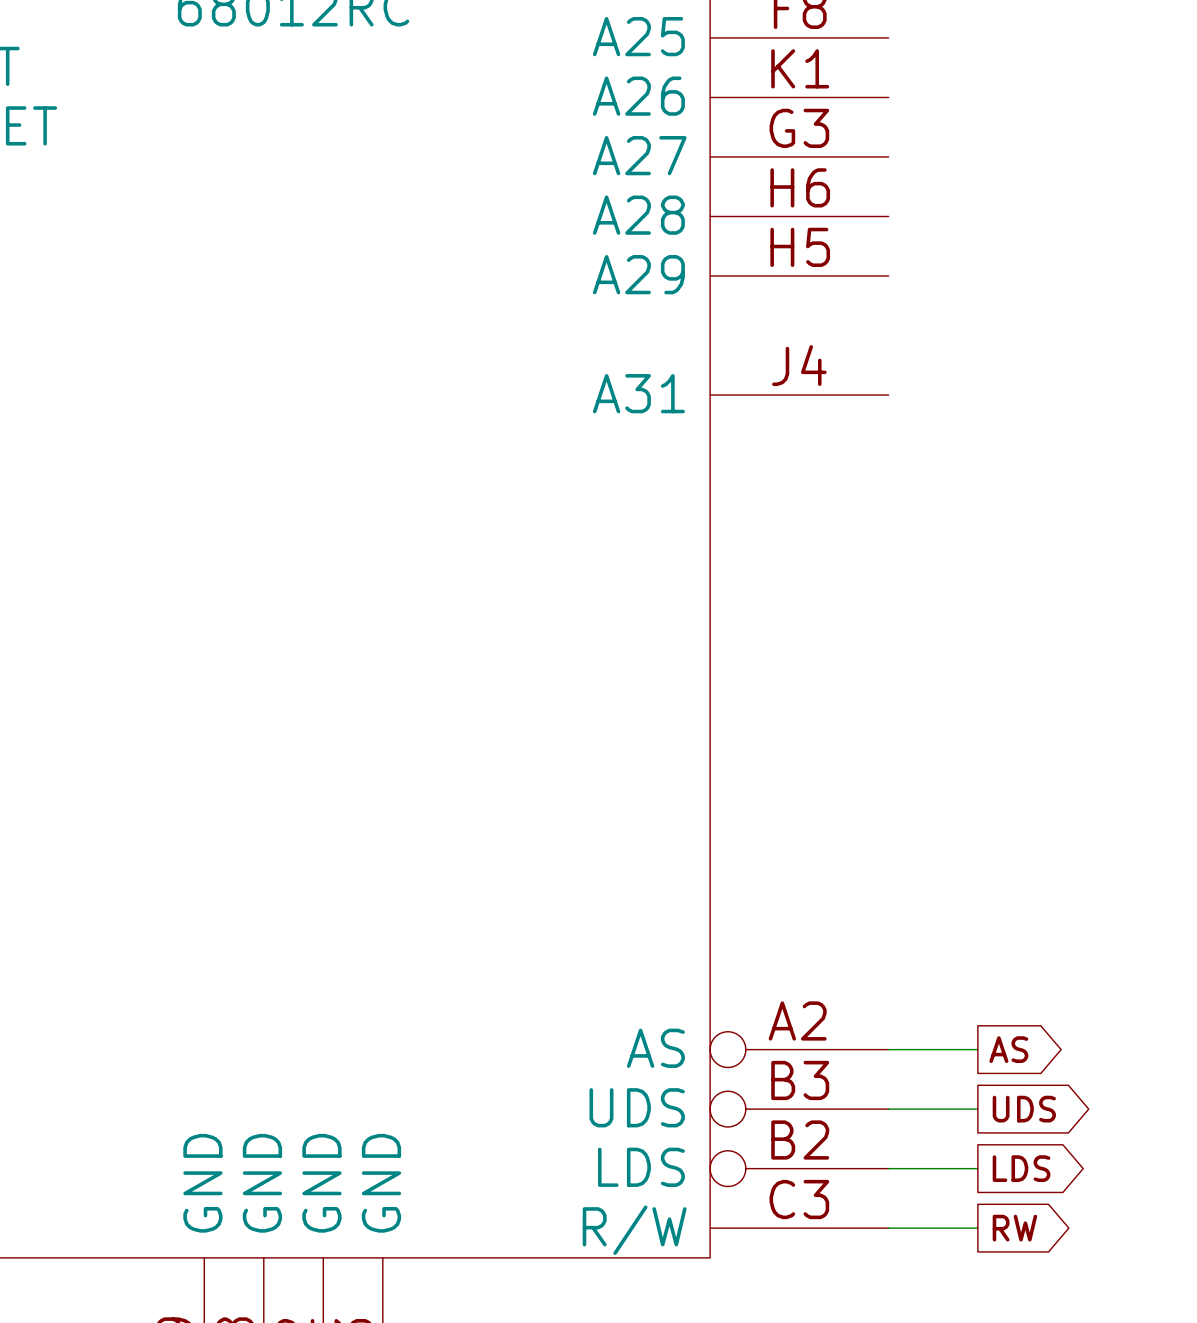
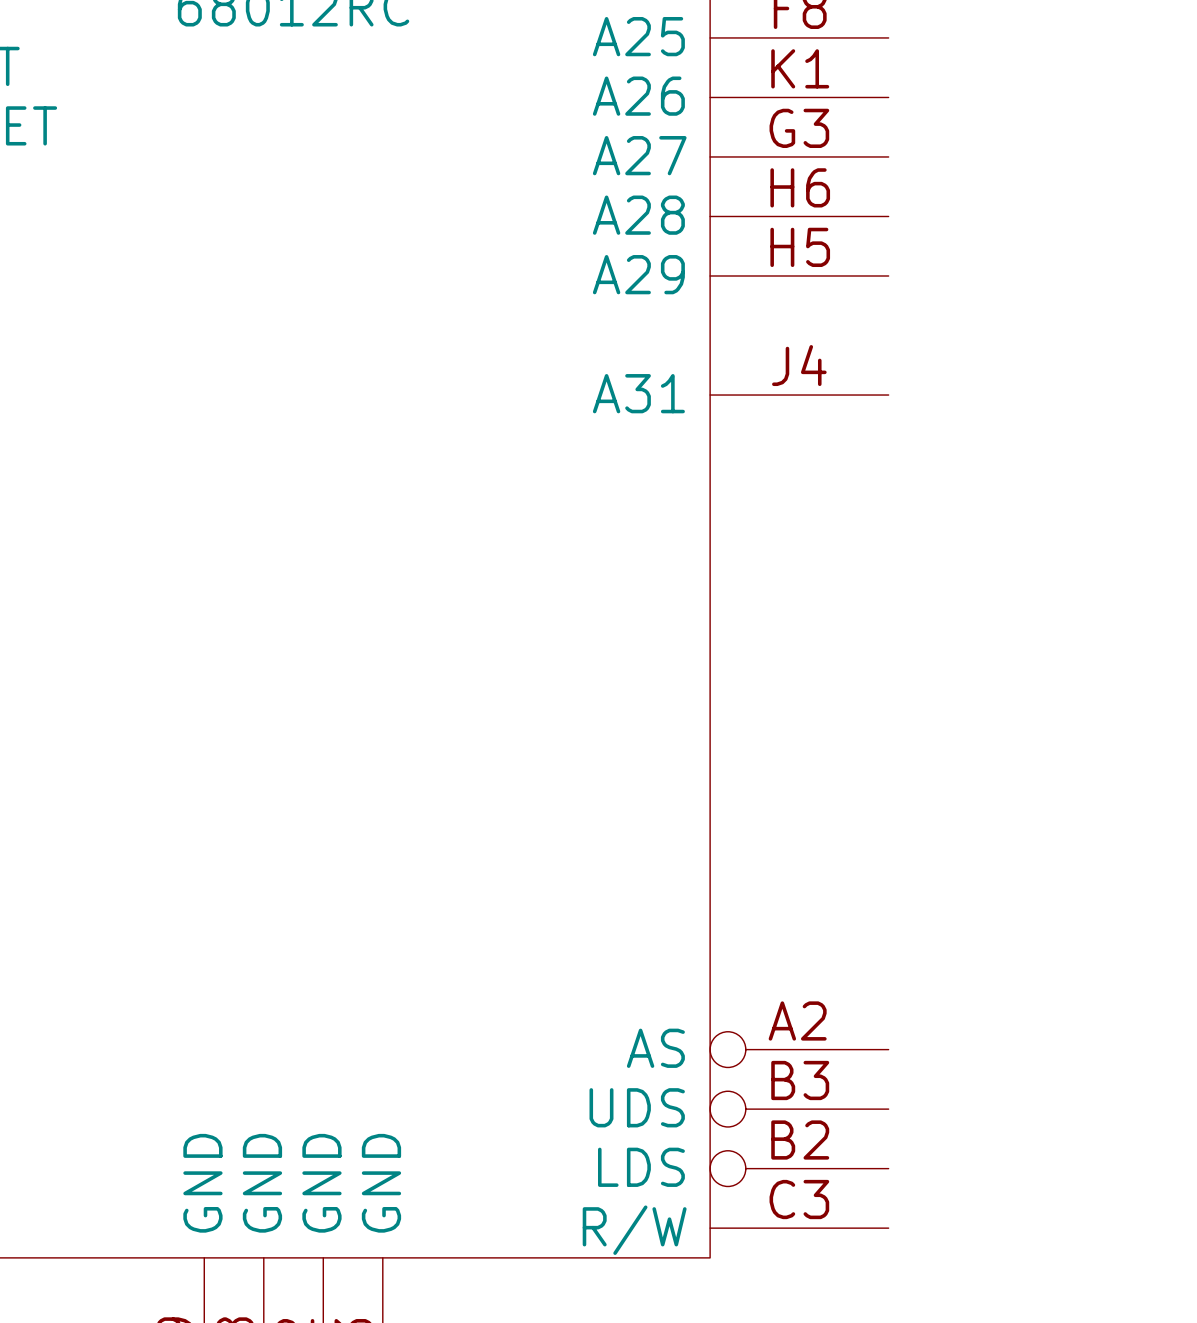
wire: (888, 1049) (977, 1049) -> none
global label: AS (1008, 1049) -> none
wire: (888, 1109) (977, 1109) -> none
global label: UDS (1024, 1109) -> none
wire: (888, 1168) (977, 1168) -> none
global label: LDS (1021, 1168) -> none
wire: (888, 1228) (977, 1228) -> none
global label: RW (1014, 1228) -> none

